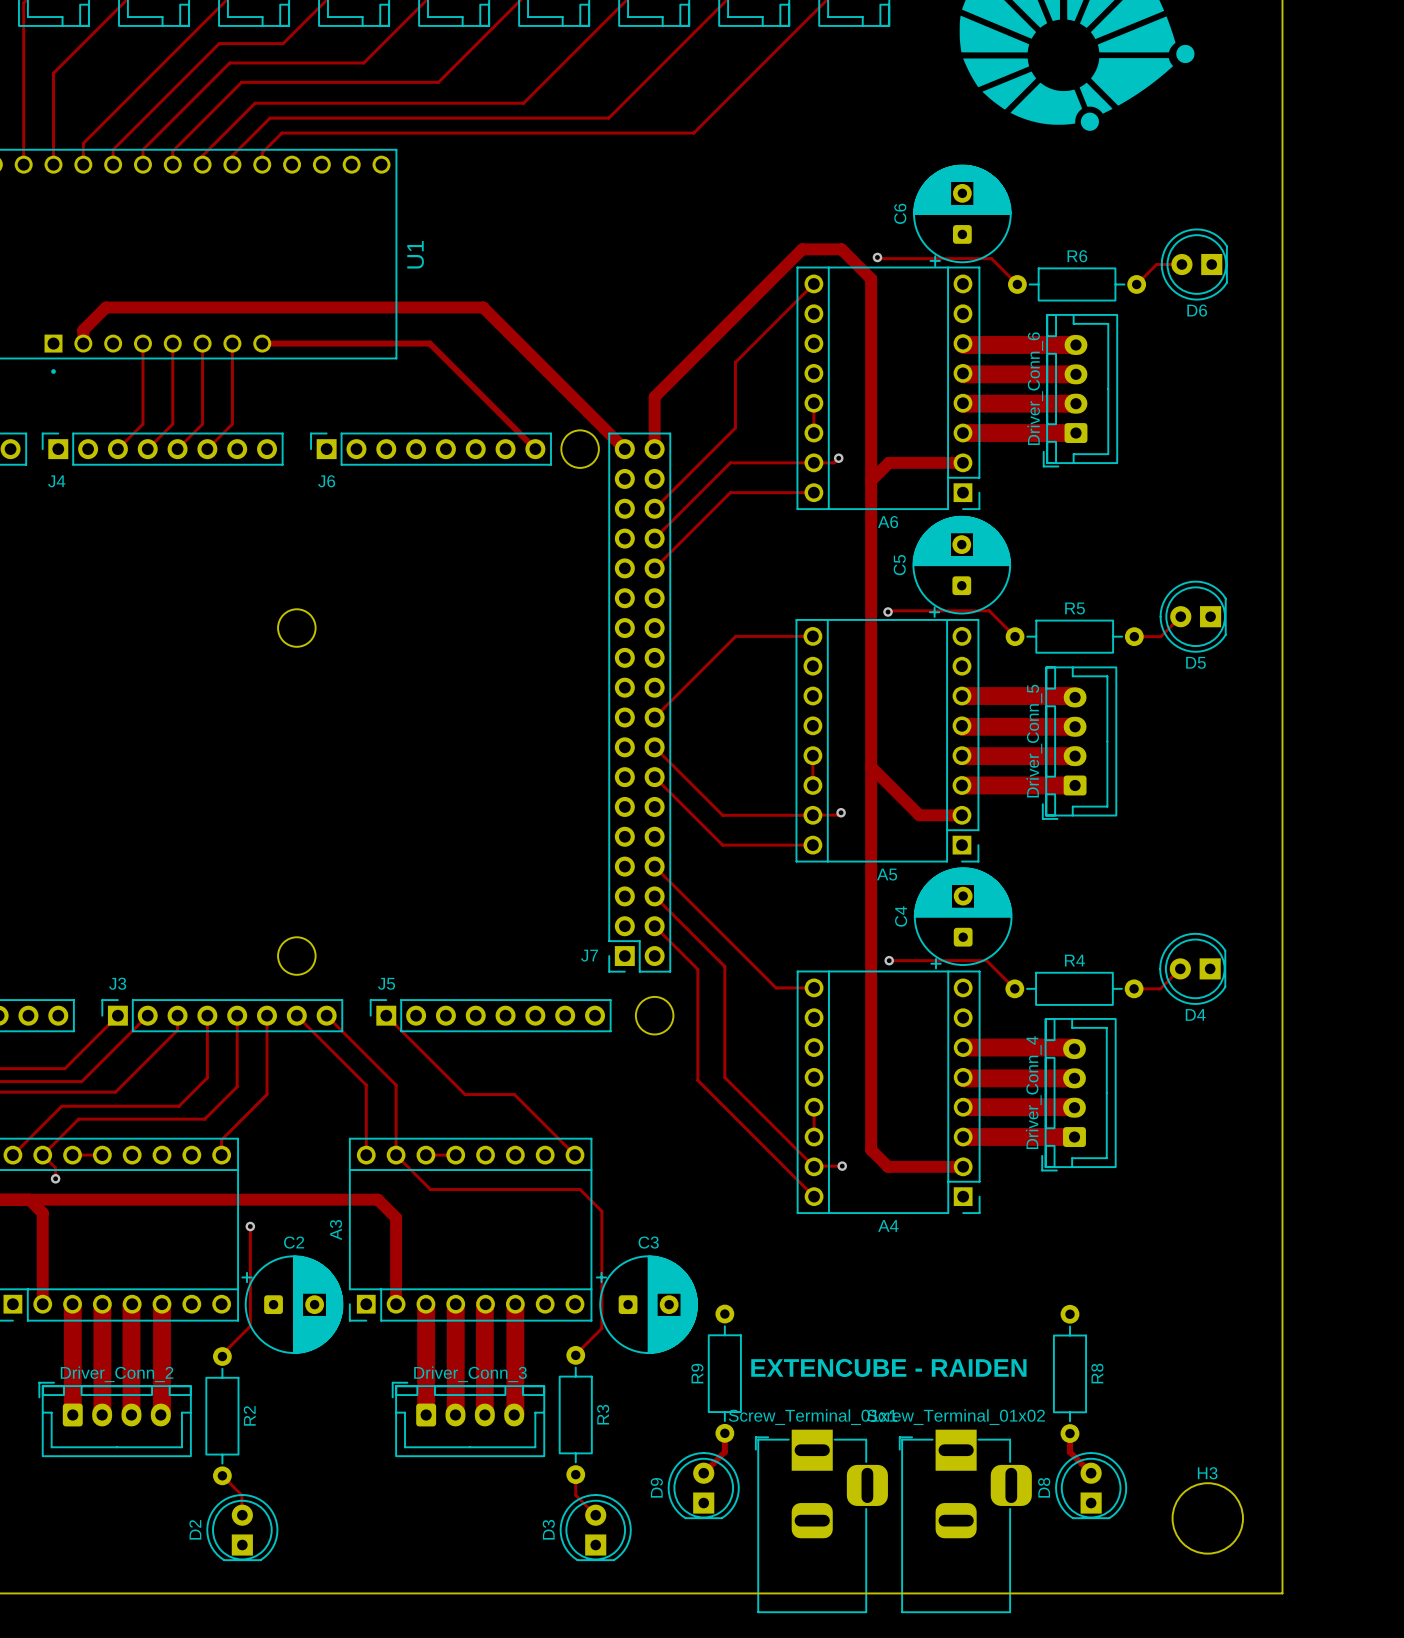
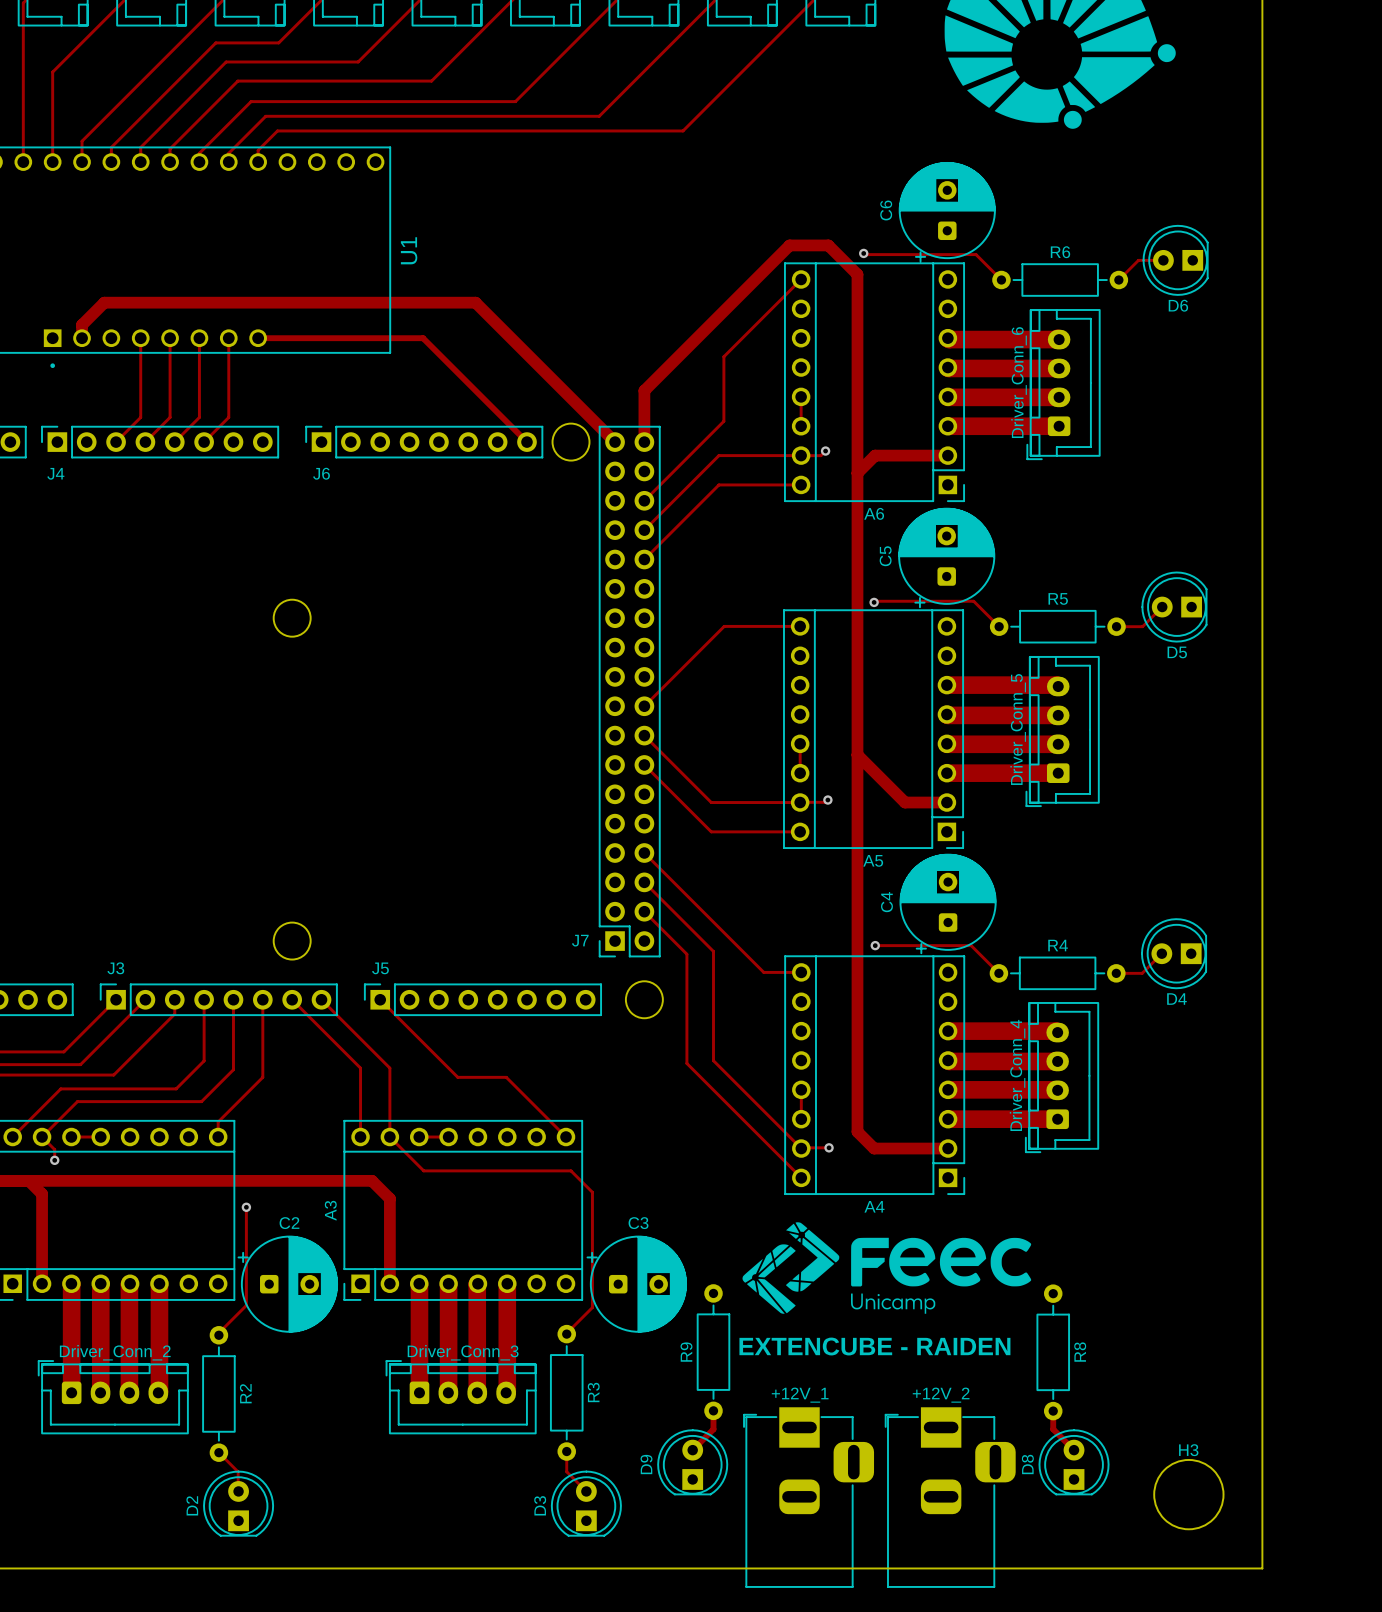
drawing: none -> [742, 1222, 1032, 1314]
Screw_Terminal_01x1 name: Screw_Terminal_01x1 (812, 1417) -> +12V_1 (800, 1395)
Screw_Terminal_01x02 name: Screw_Terminal_01x02 (956, 1417) -> +12V_2 (941, 1395)

